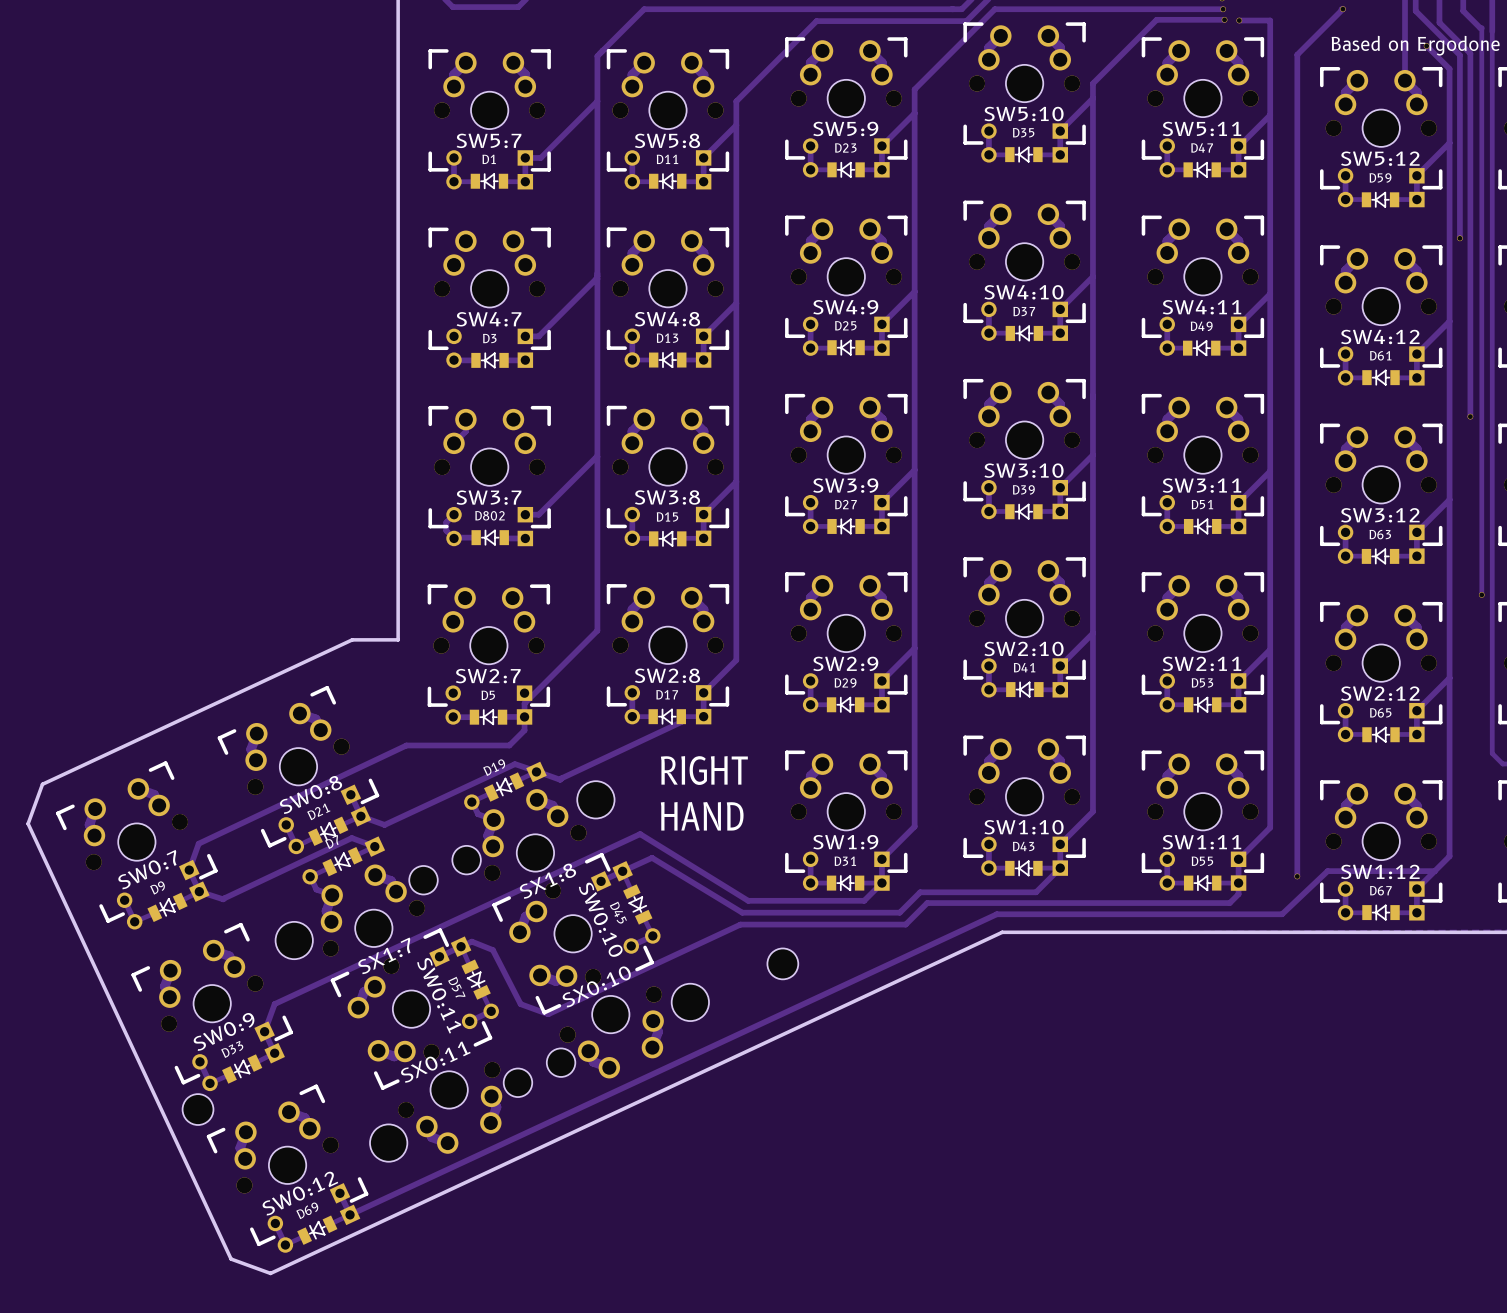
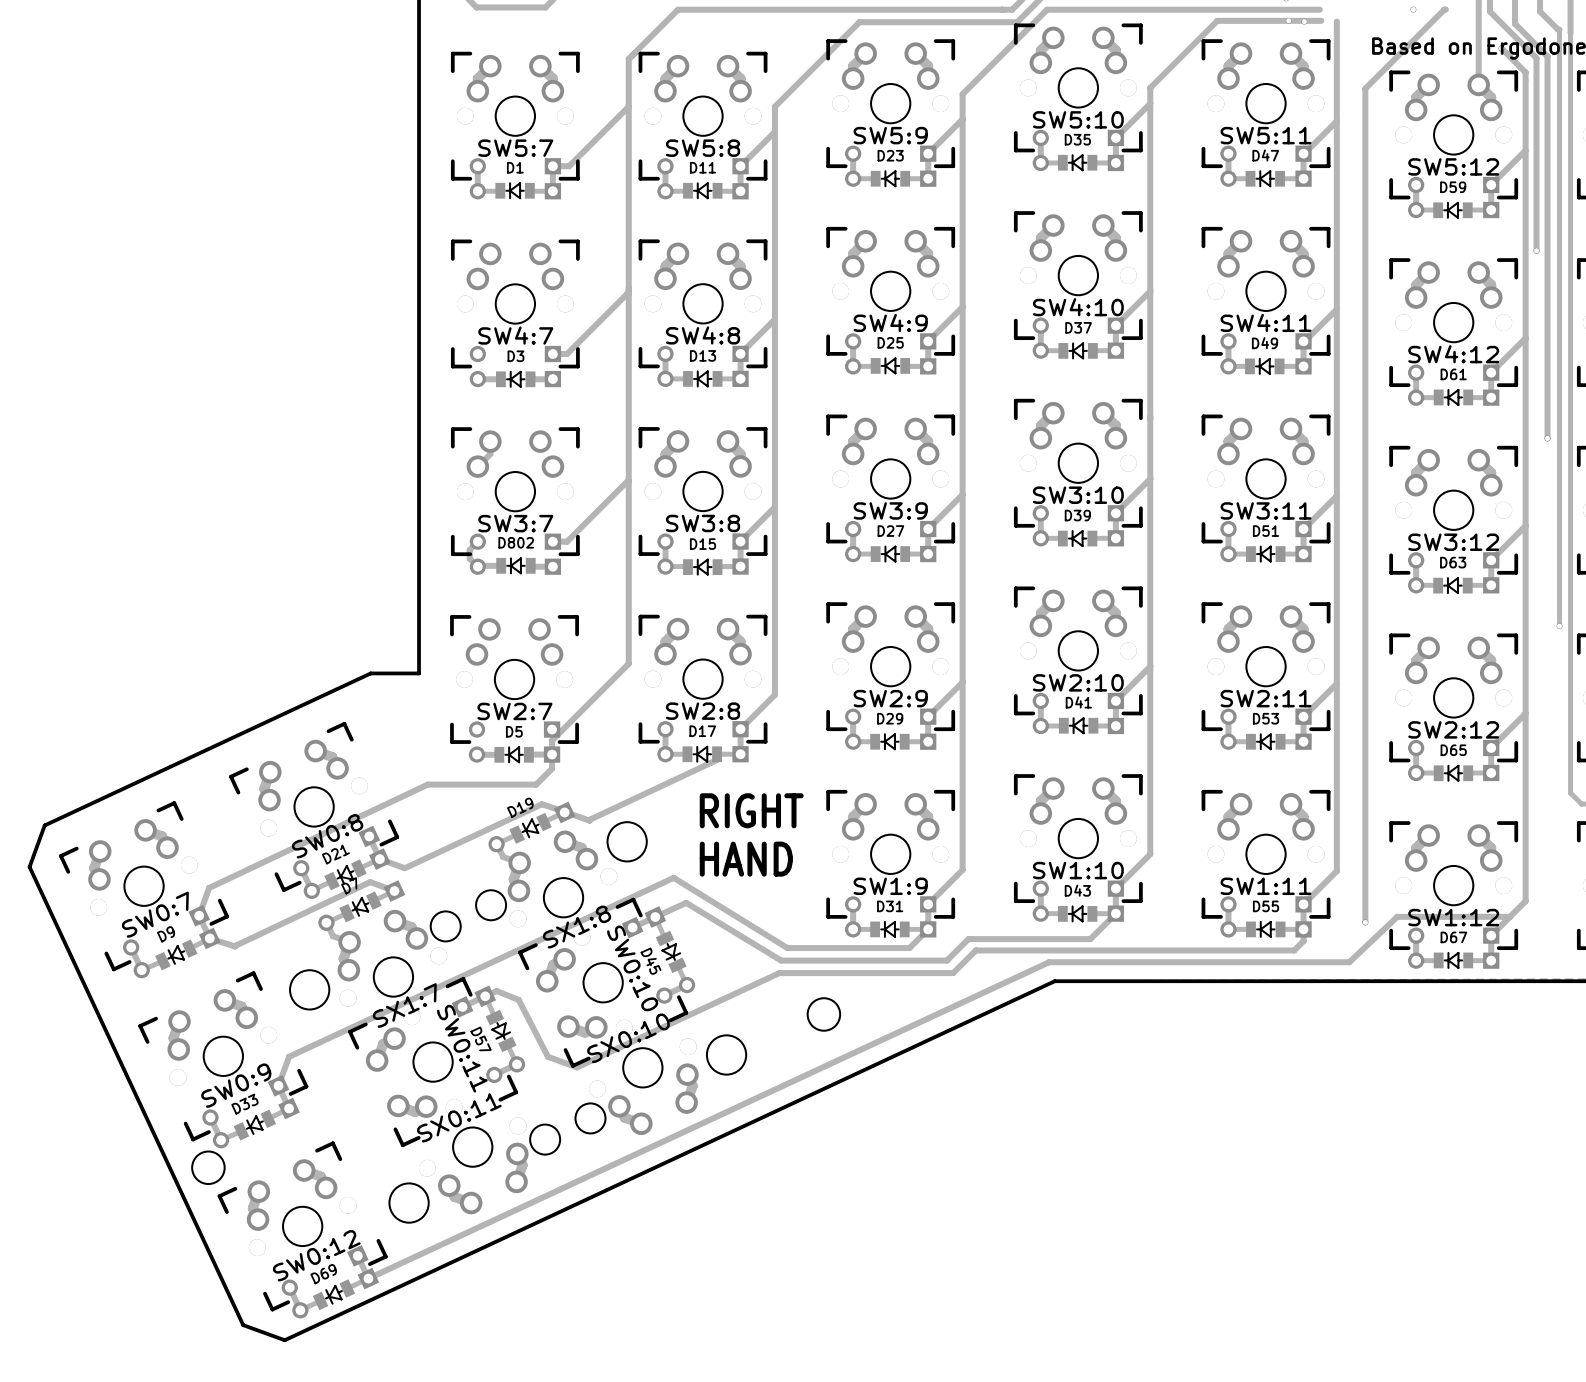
track: none -> (1287, 9) (1319, 9)
via: (1223, 9) -> none
track: (1341, 9) (1297, 54) (1297, 84) -> (1445, 9) (1365, 88)
track: (1239, 20) (1270, 20) -> (1288, 20) (1321, 20)

